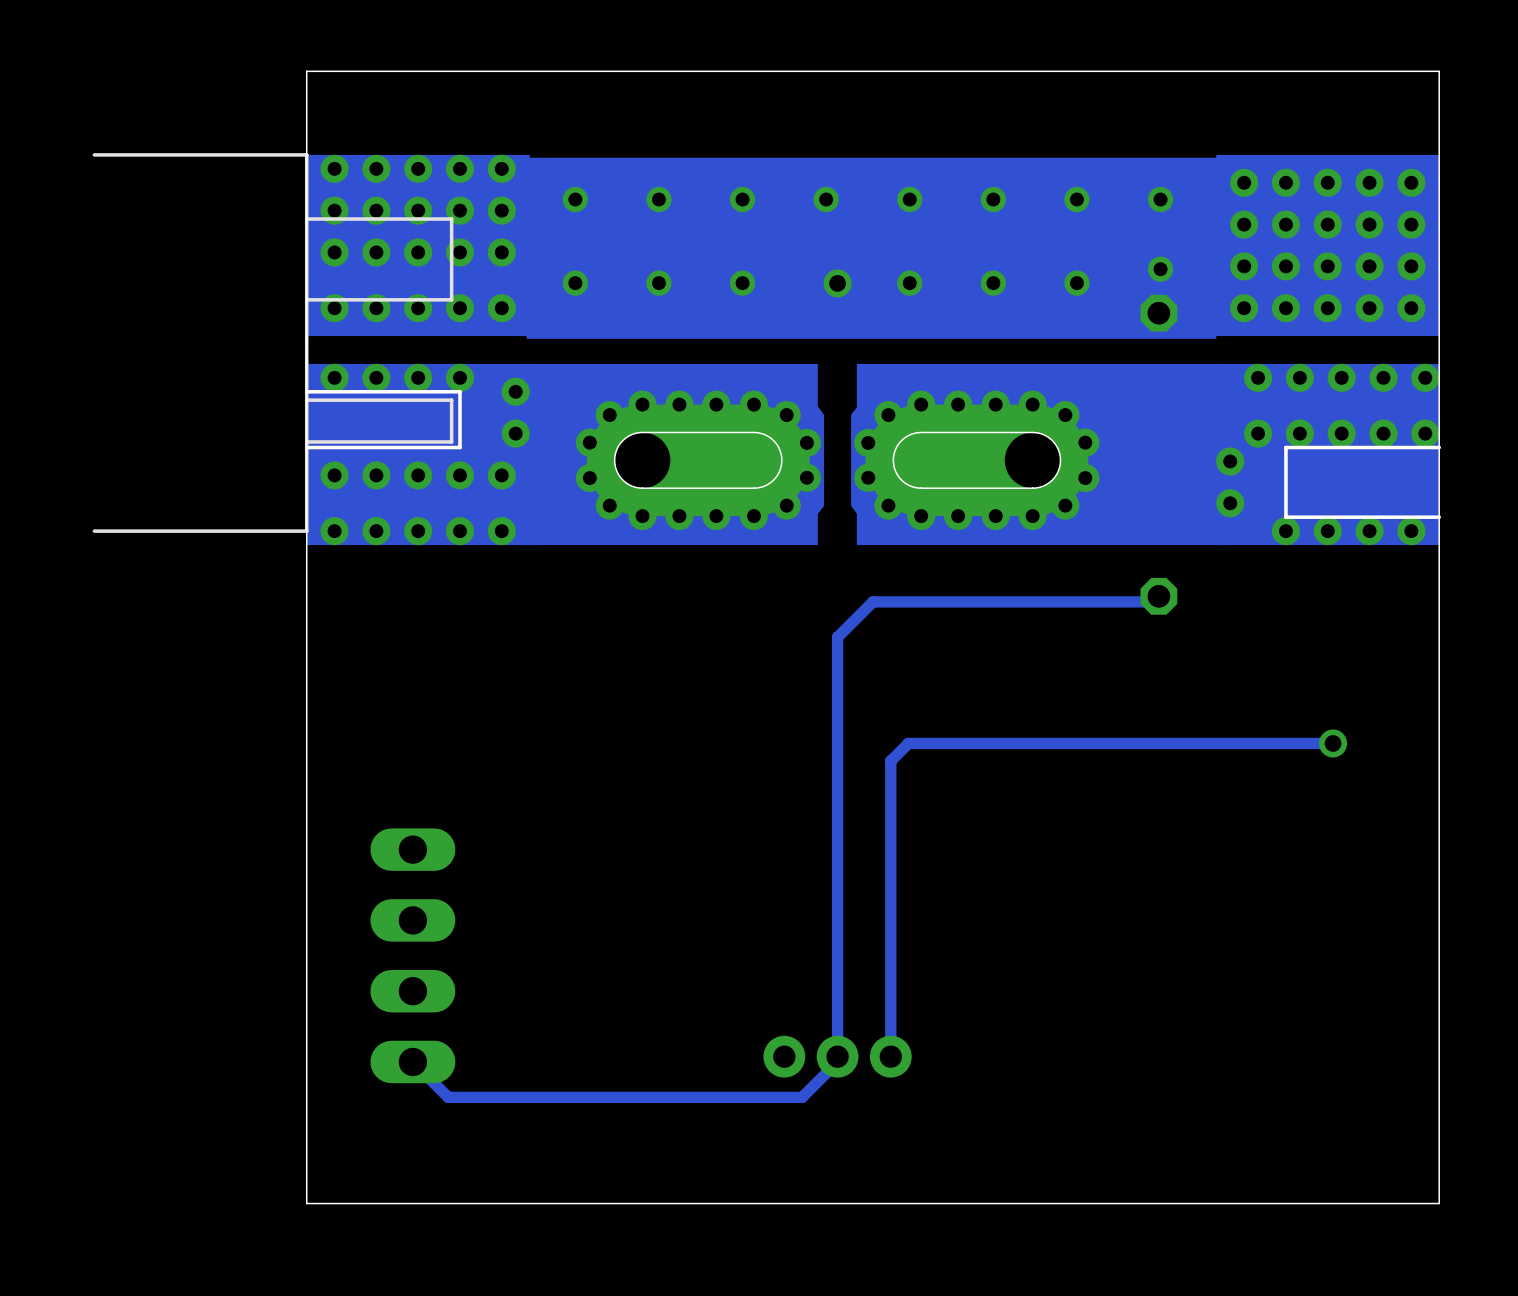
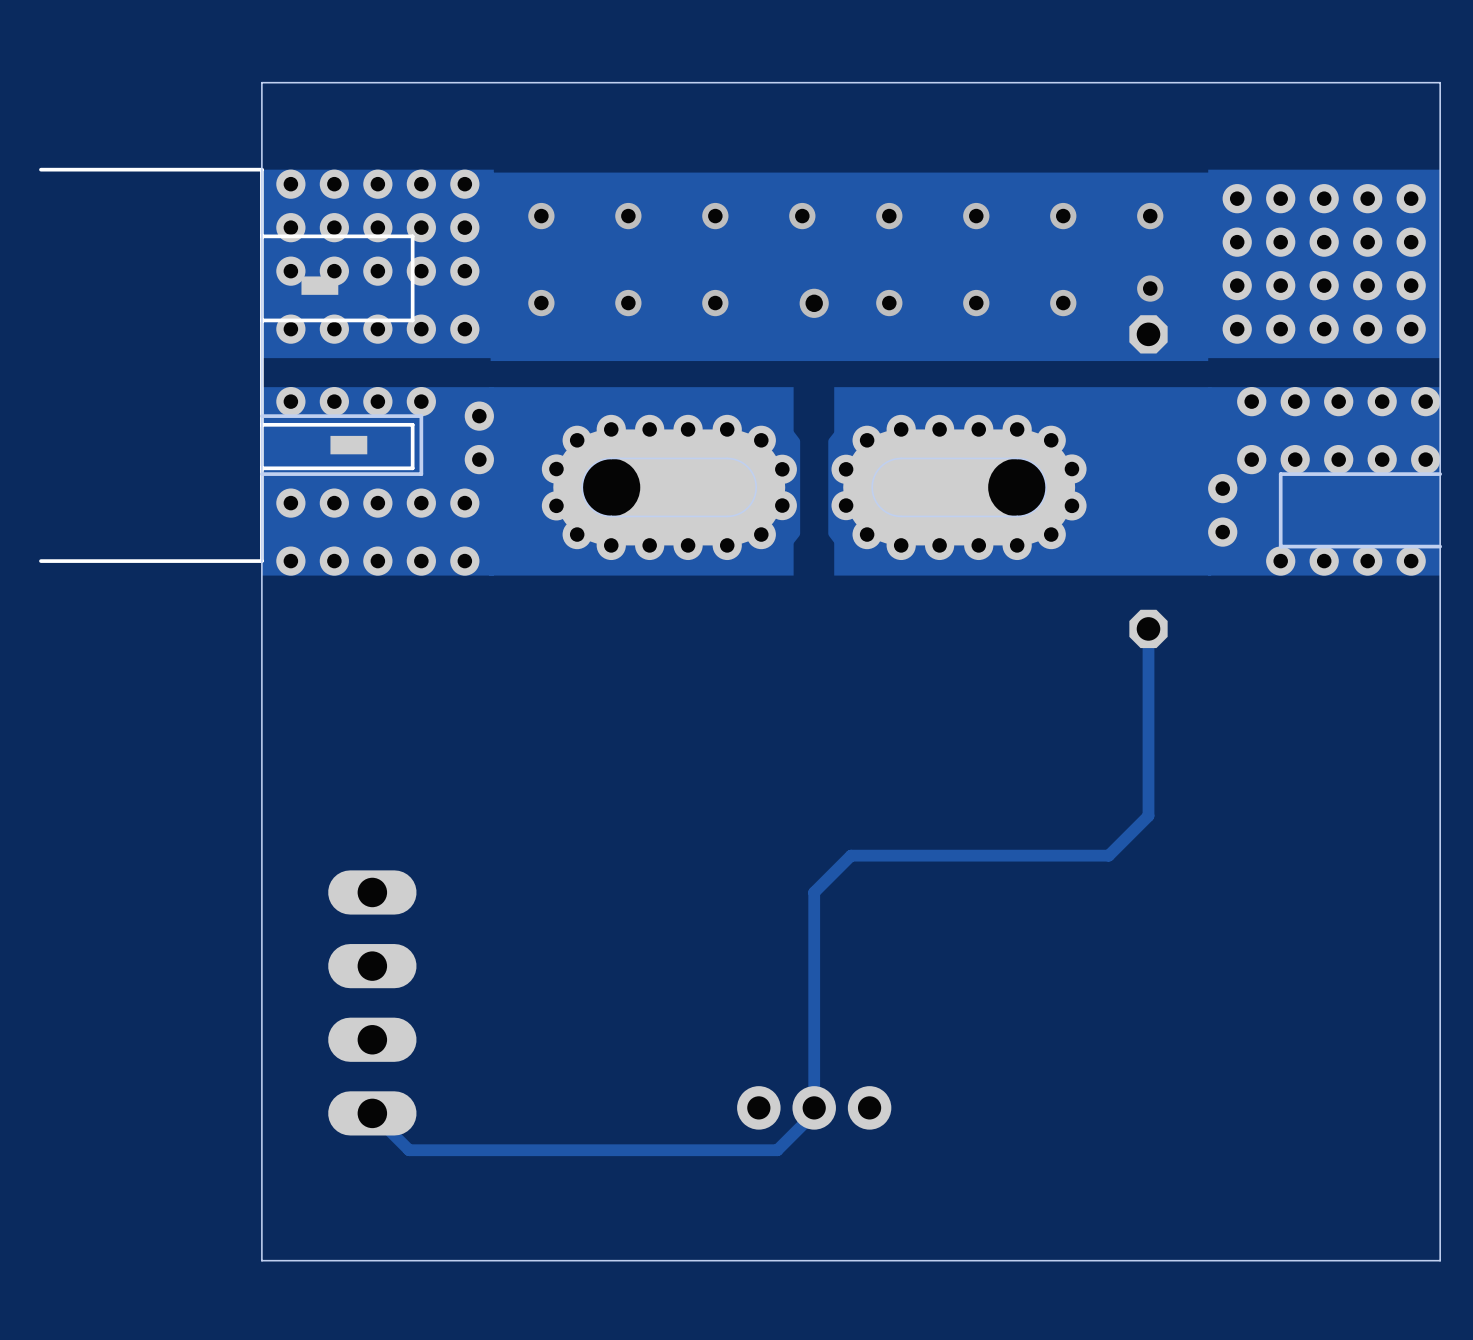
track: (1158, 596) (1153, 601) (872, 601) (837, 637) (837, 849) -> (1148, 628) (1148, 815) (1108, 855) (851, 855) (814, 892)
track: (1333, 743) (908, 743) (890, 761) (890, 1056) -> none
via: (1333, 743) -> none

